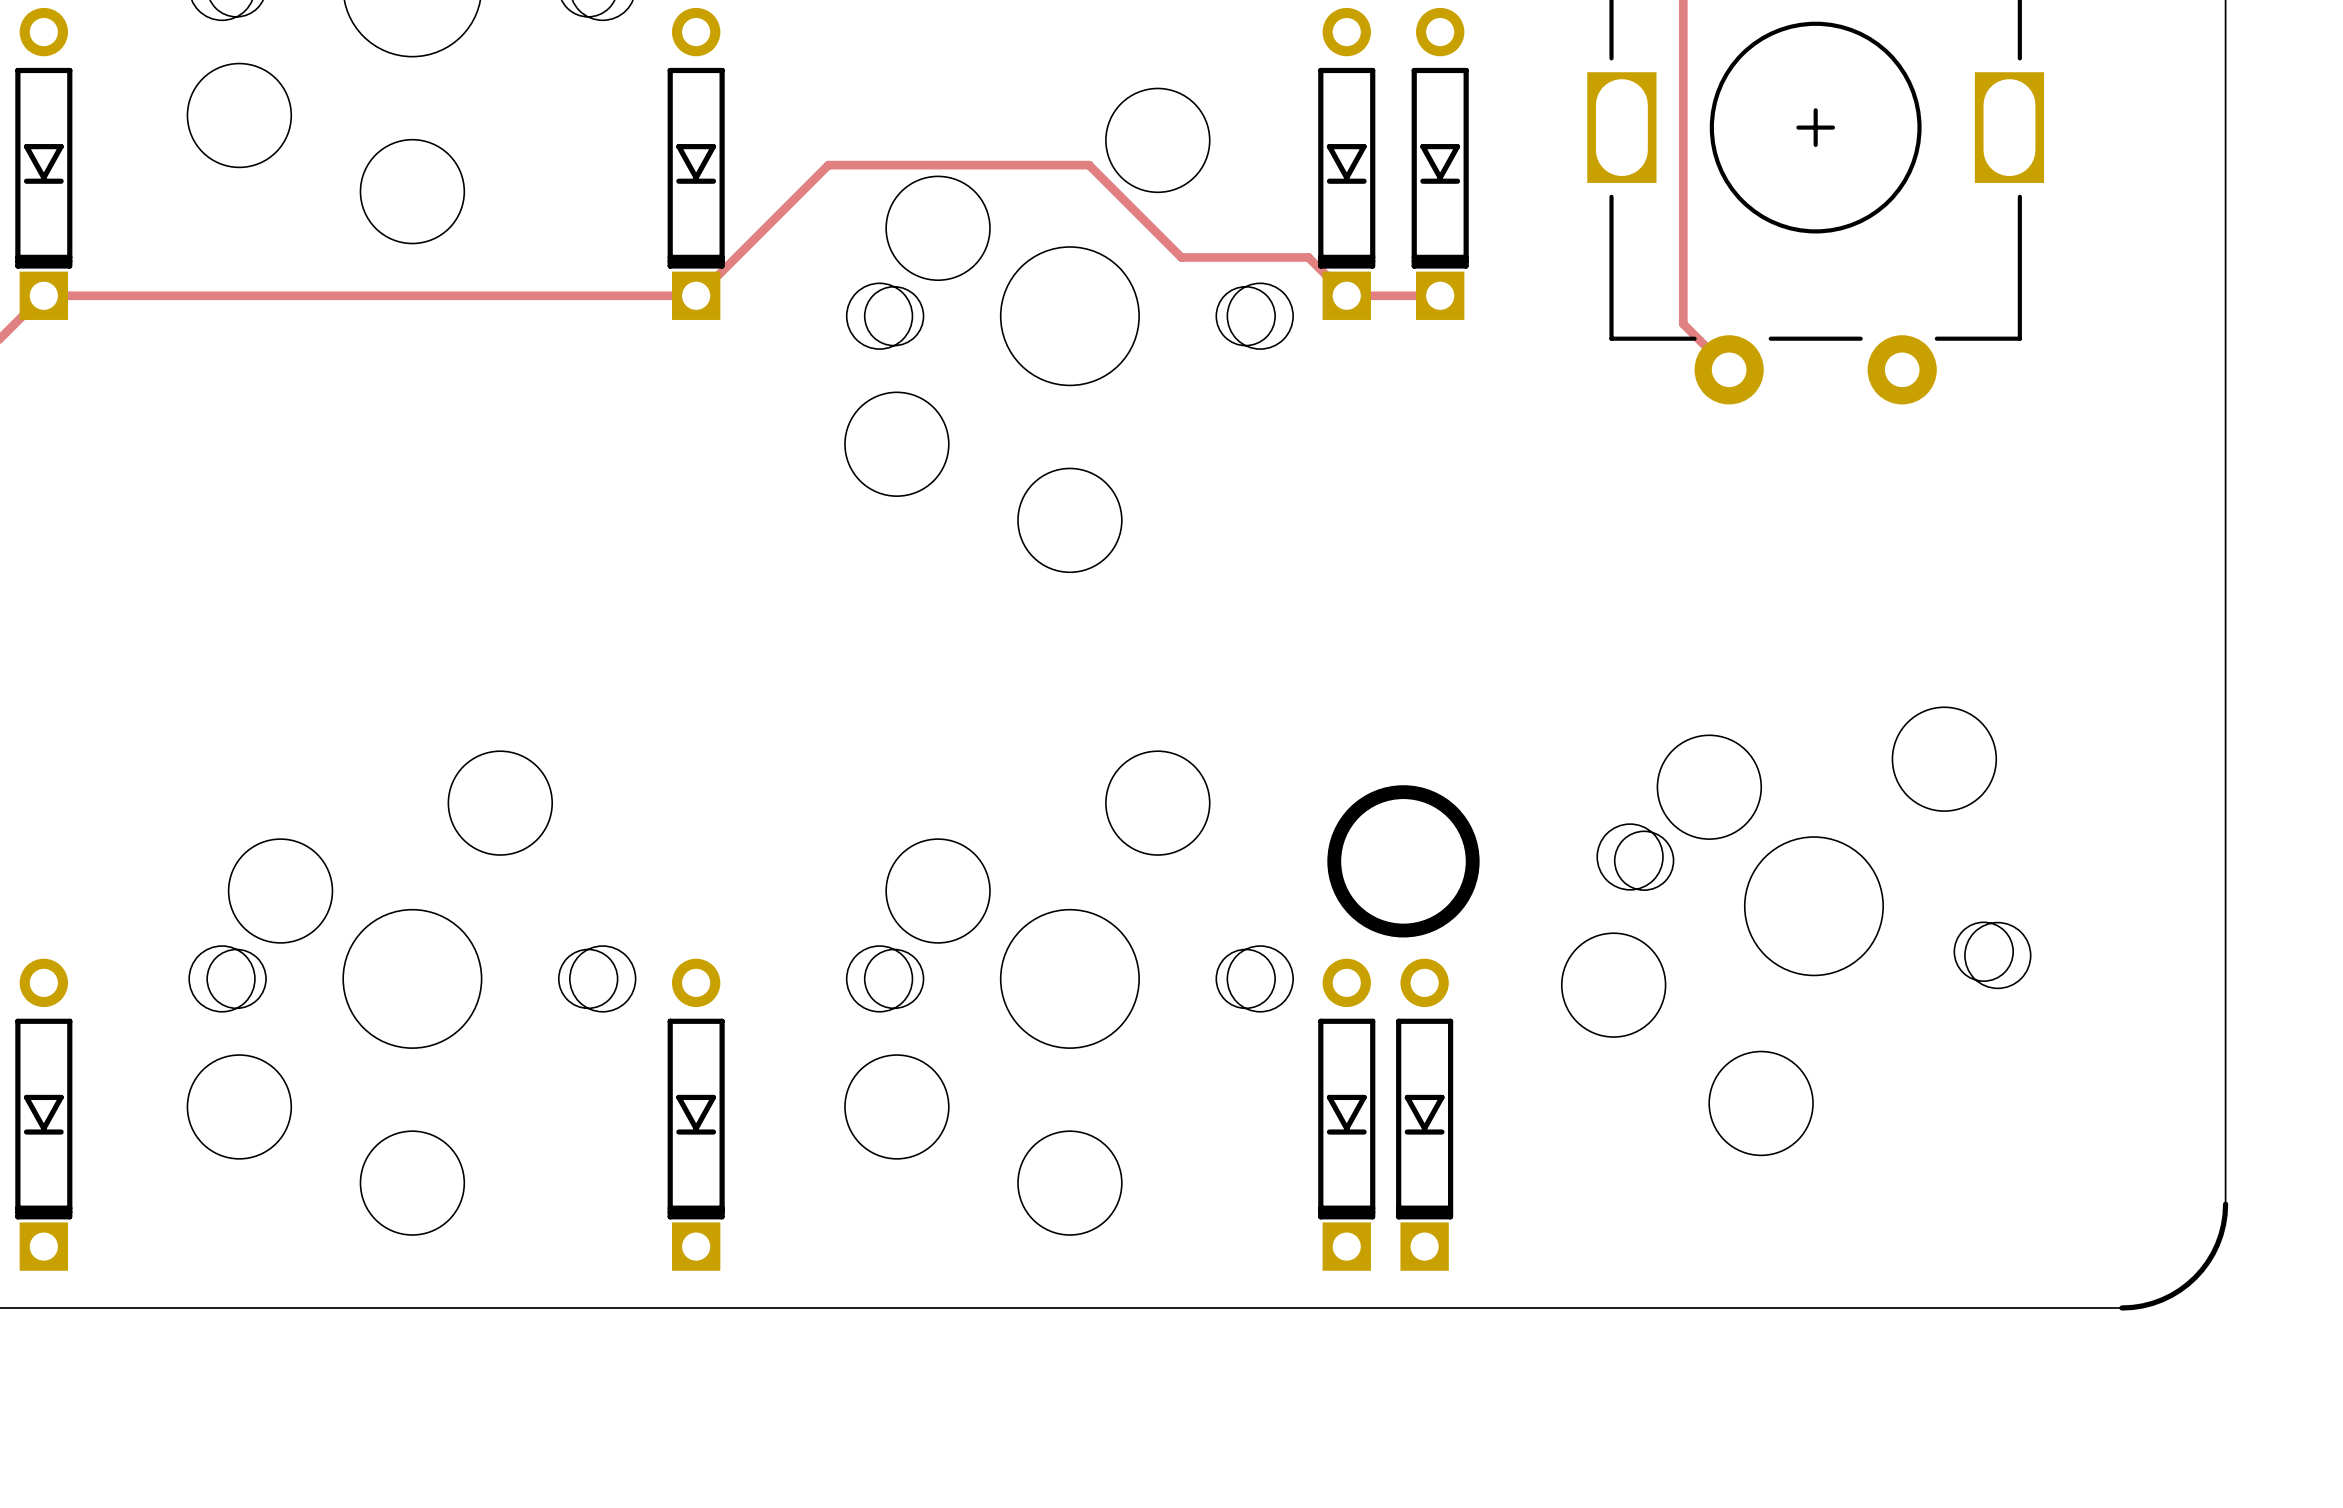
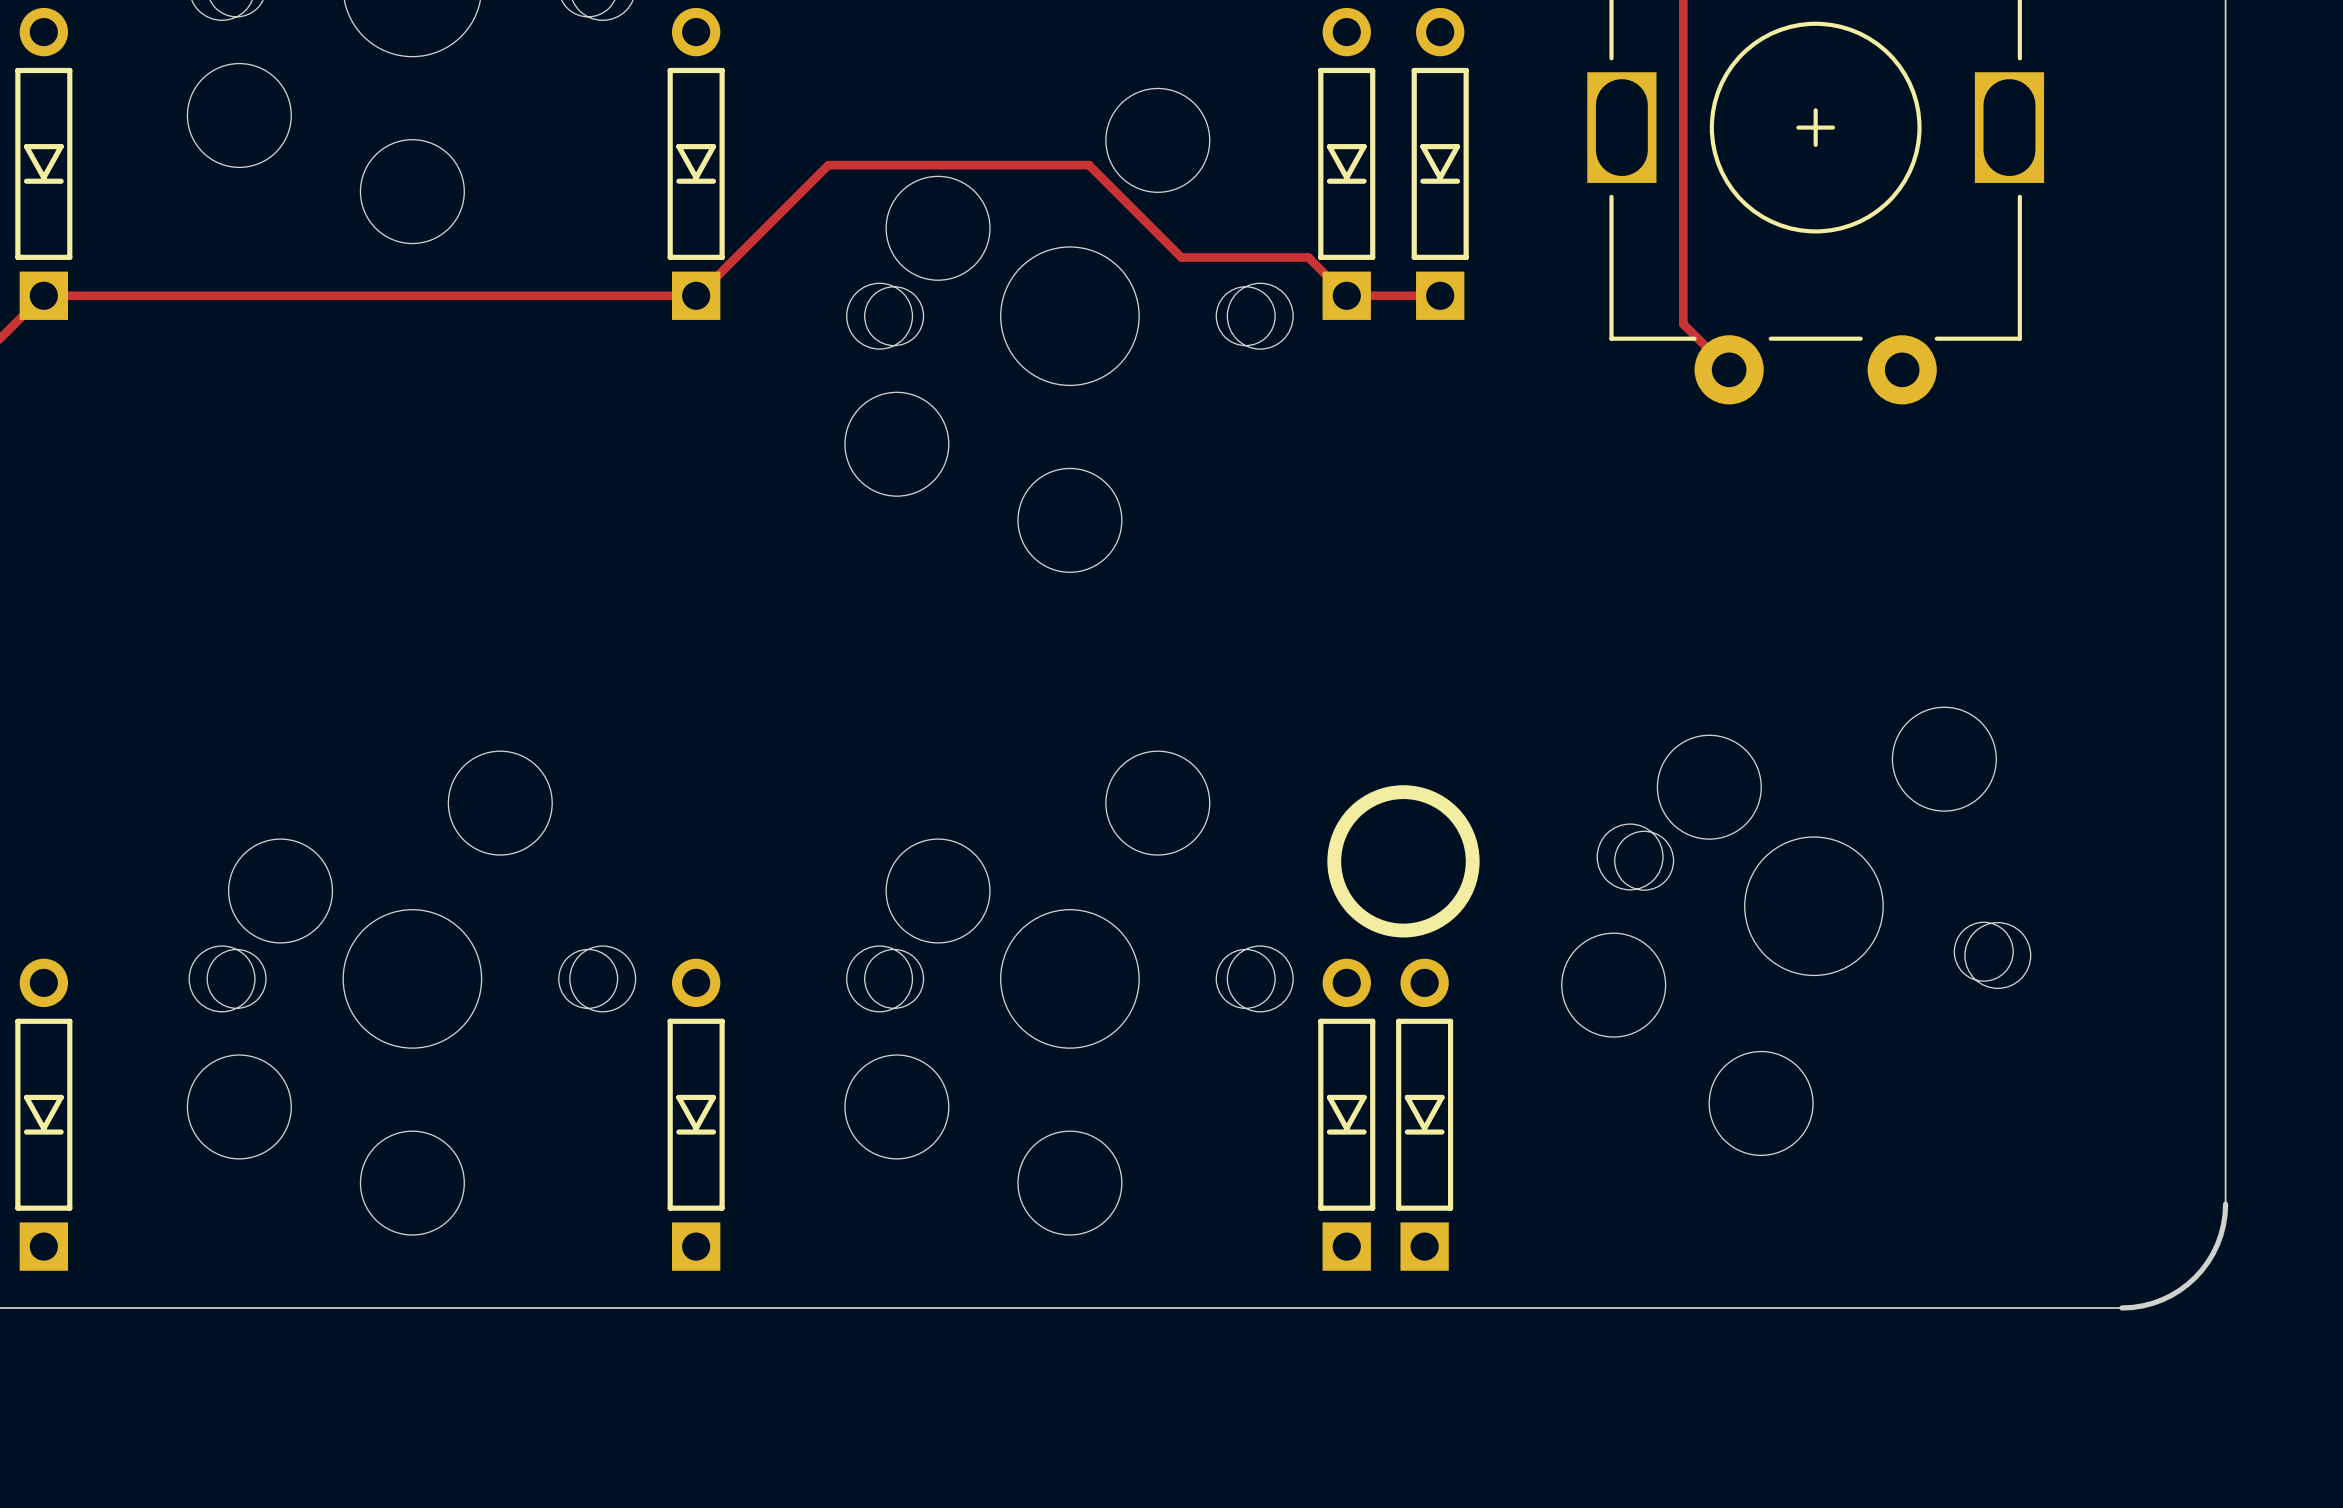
part footprint: [15, 7, 73, 320] -> [15, 7, 73, 320]
part footprint: [667, 7, 725, 320] -> [667, 7, 725, 320]
part footprint: [1318, 7, 1376, 320] -> [1318, 7, 1376, 320]
part footprint: [1411, 7, 1469, 320] -> [1411, 7, 1469, 320]
part footprint: [15, 958, 73, 1271] -> [15, 958, 73, 1271]
part footprint: [667, 958, 725, 1271] -> [667, 958, 725, 1271]
part footprint: [1318, 958, 1376, 1271] -> [1318, 958, 1376, 1271]
part footprint: [1396, 958, 1454, 1271] -> [1396, 958, 1454, 1271]

